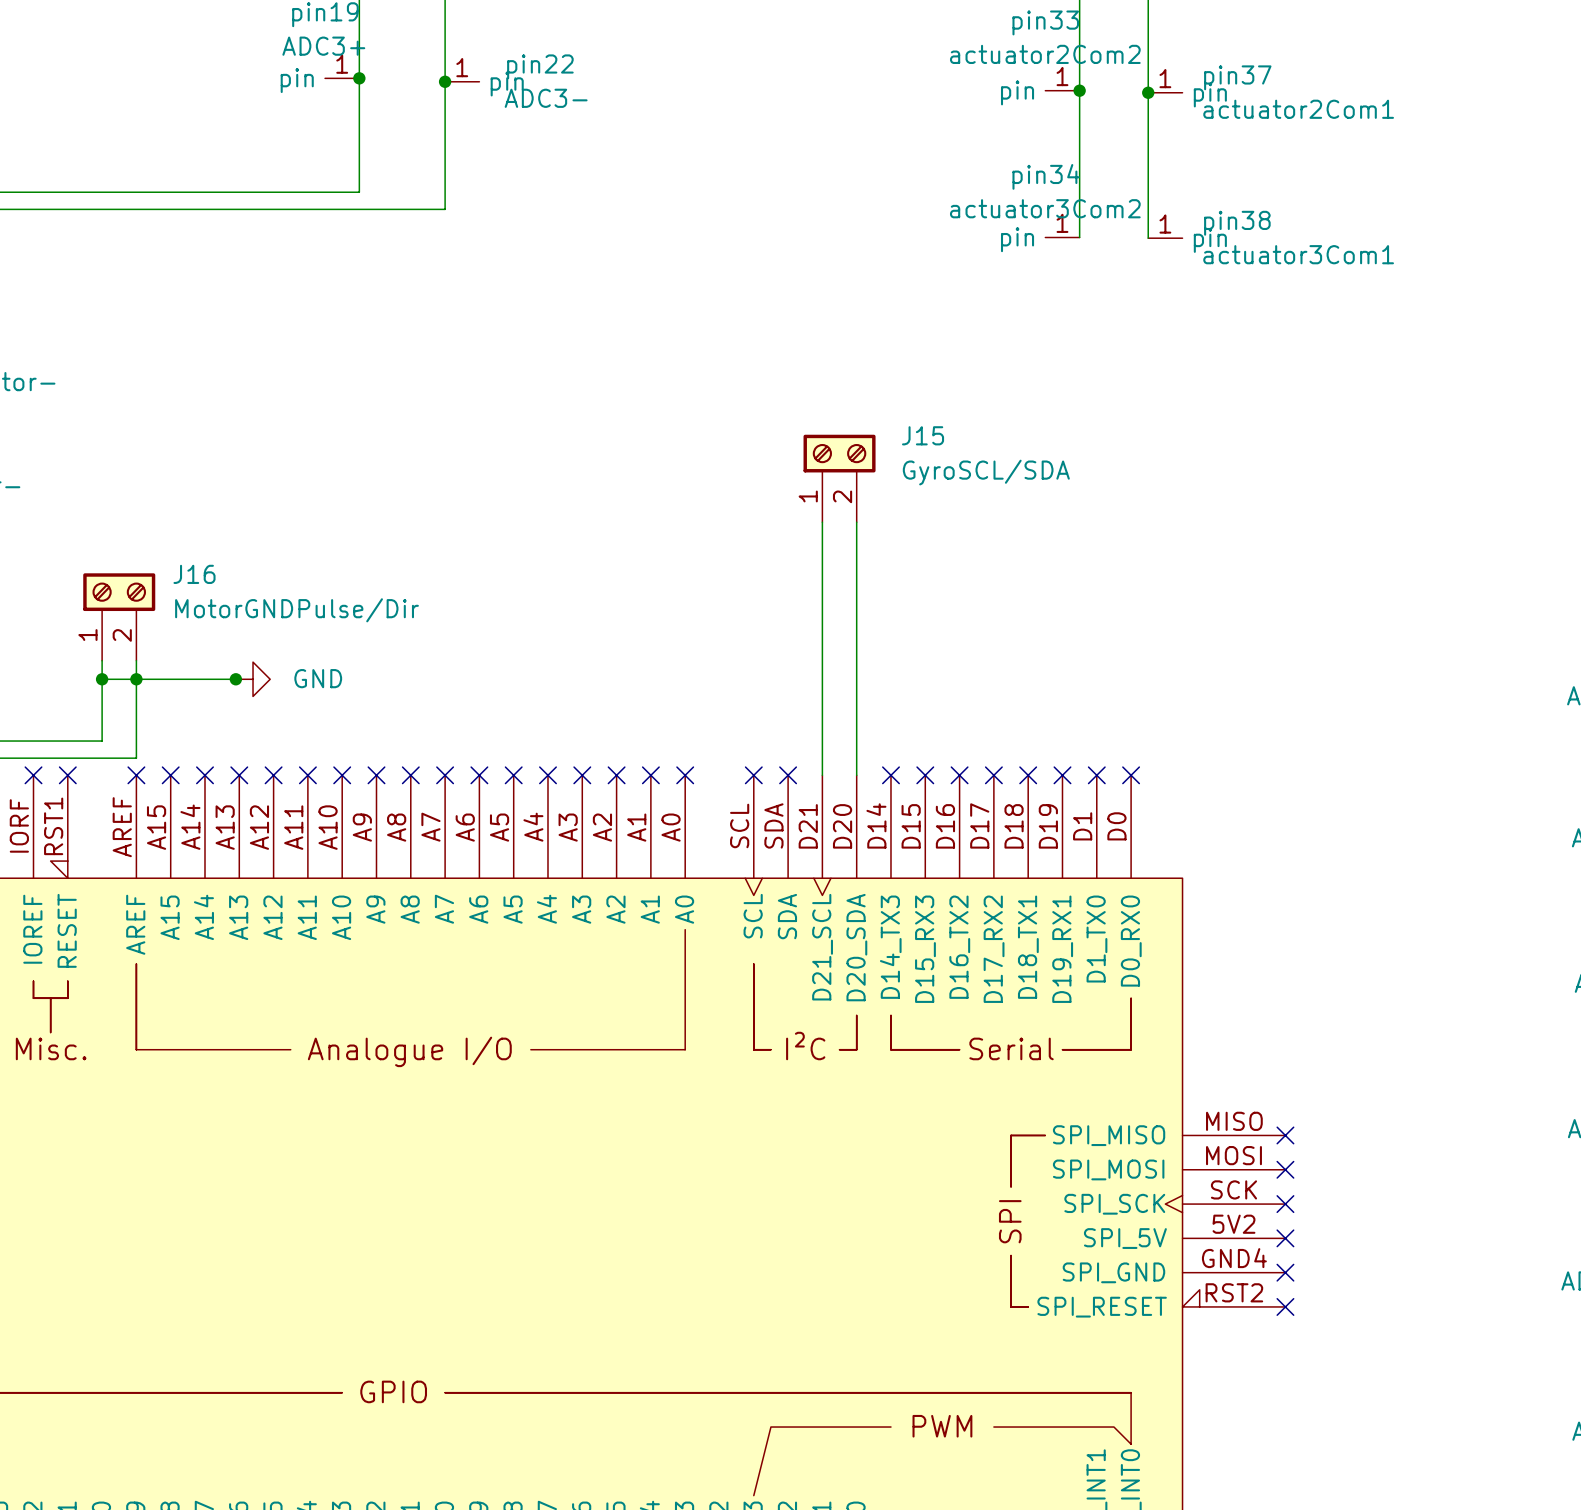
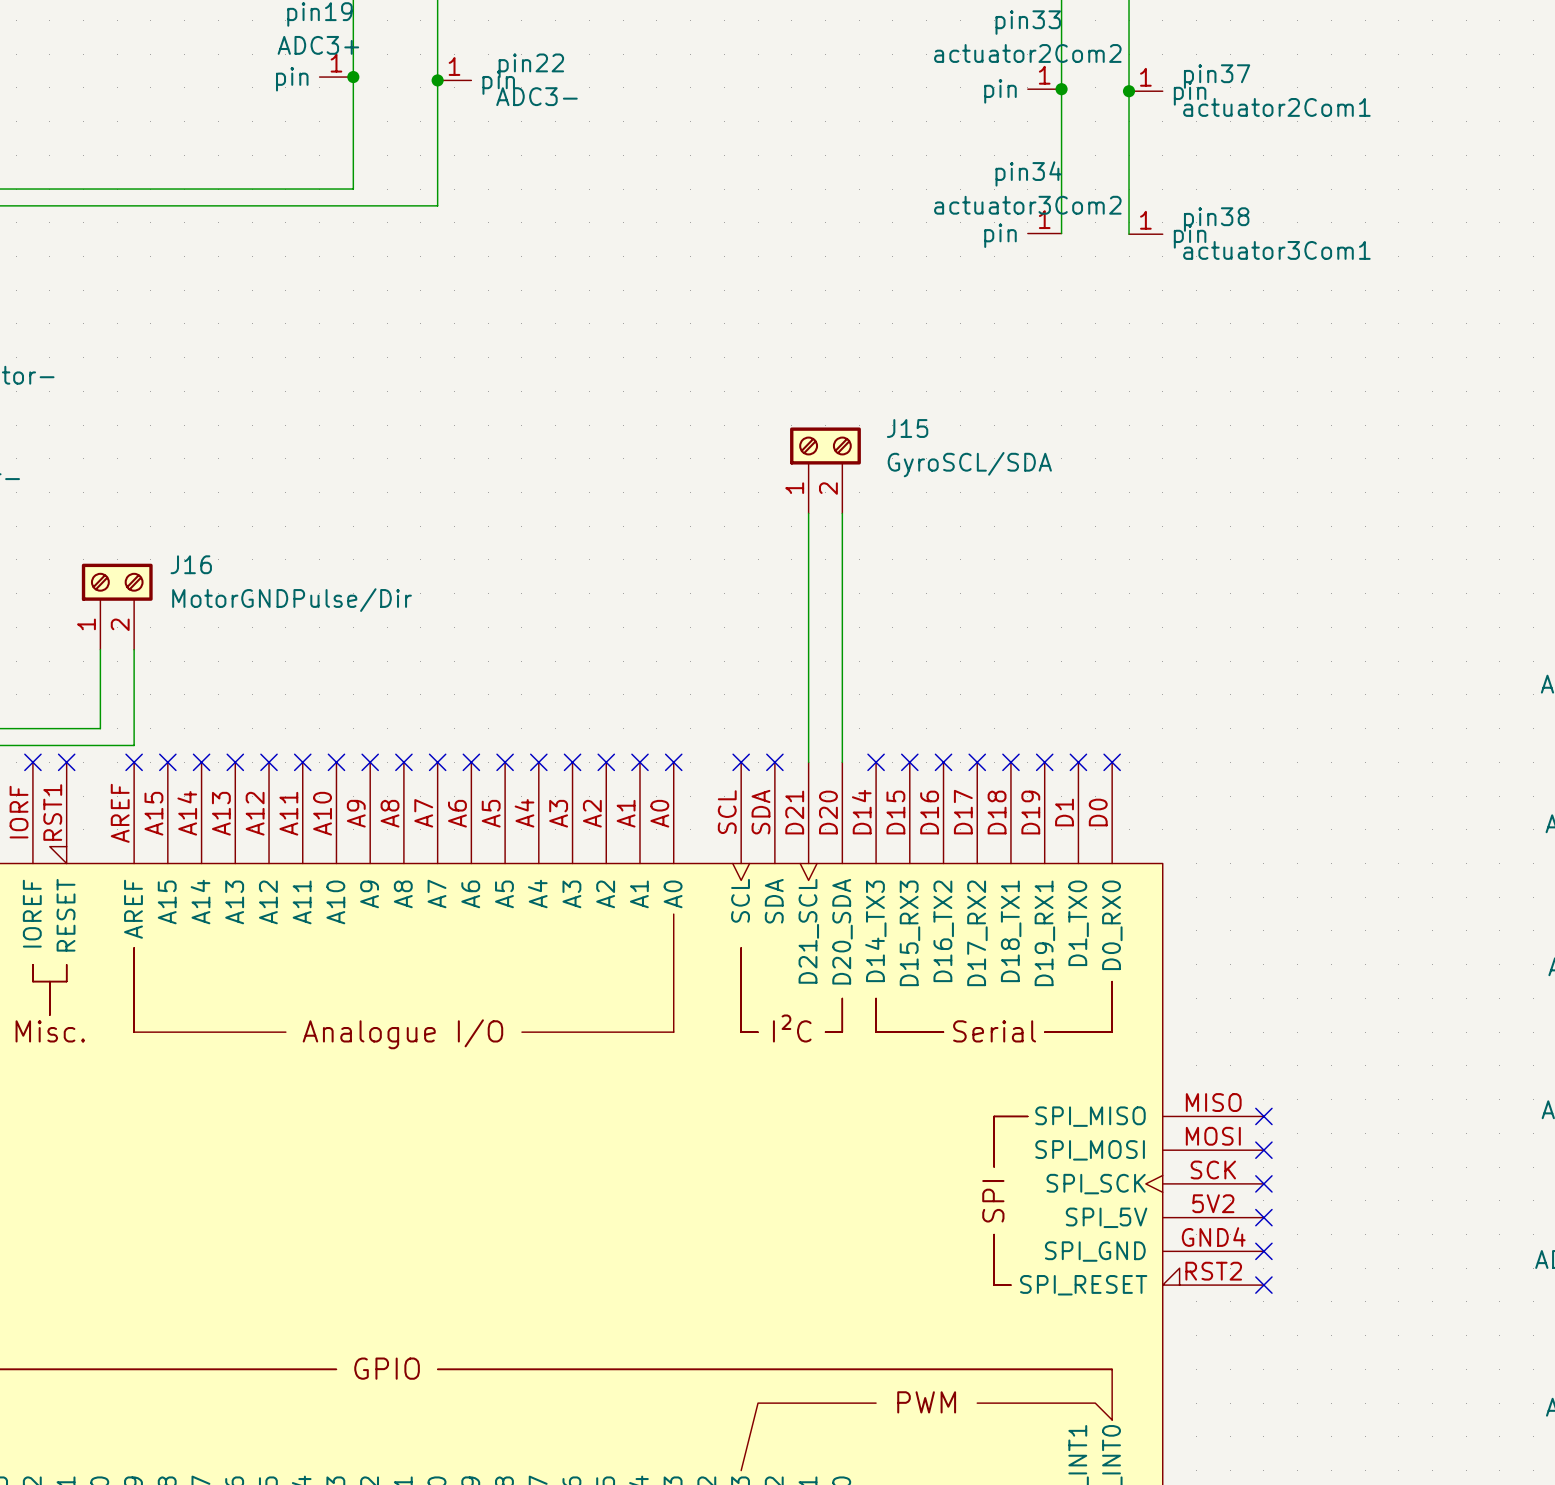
wire: (102, 679) (236, 679) -> none
junction: (102, 679) -> none
junction: (136, 679) -> none
junction: (235, 679) -> none
power symbol: GND (253, 679) -> none

